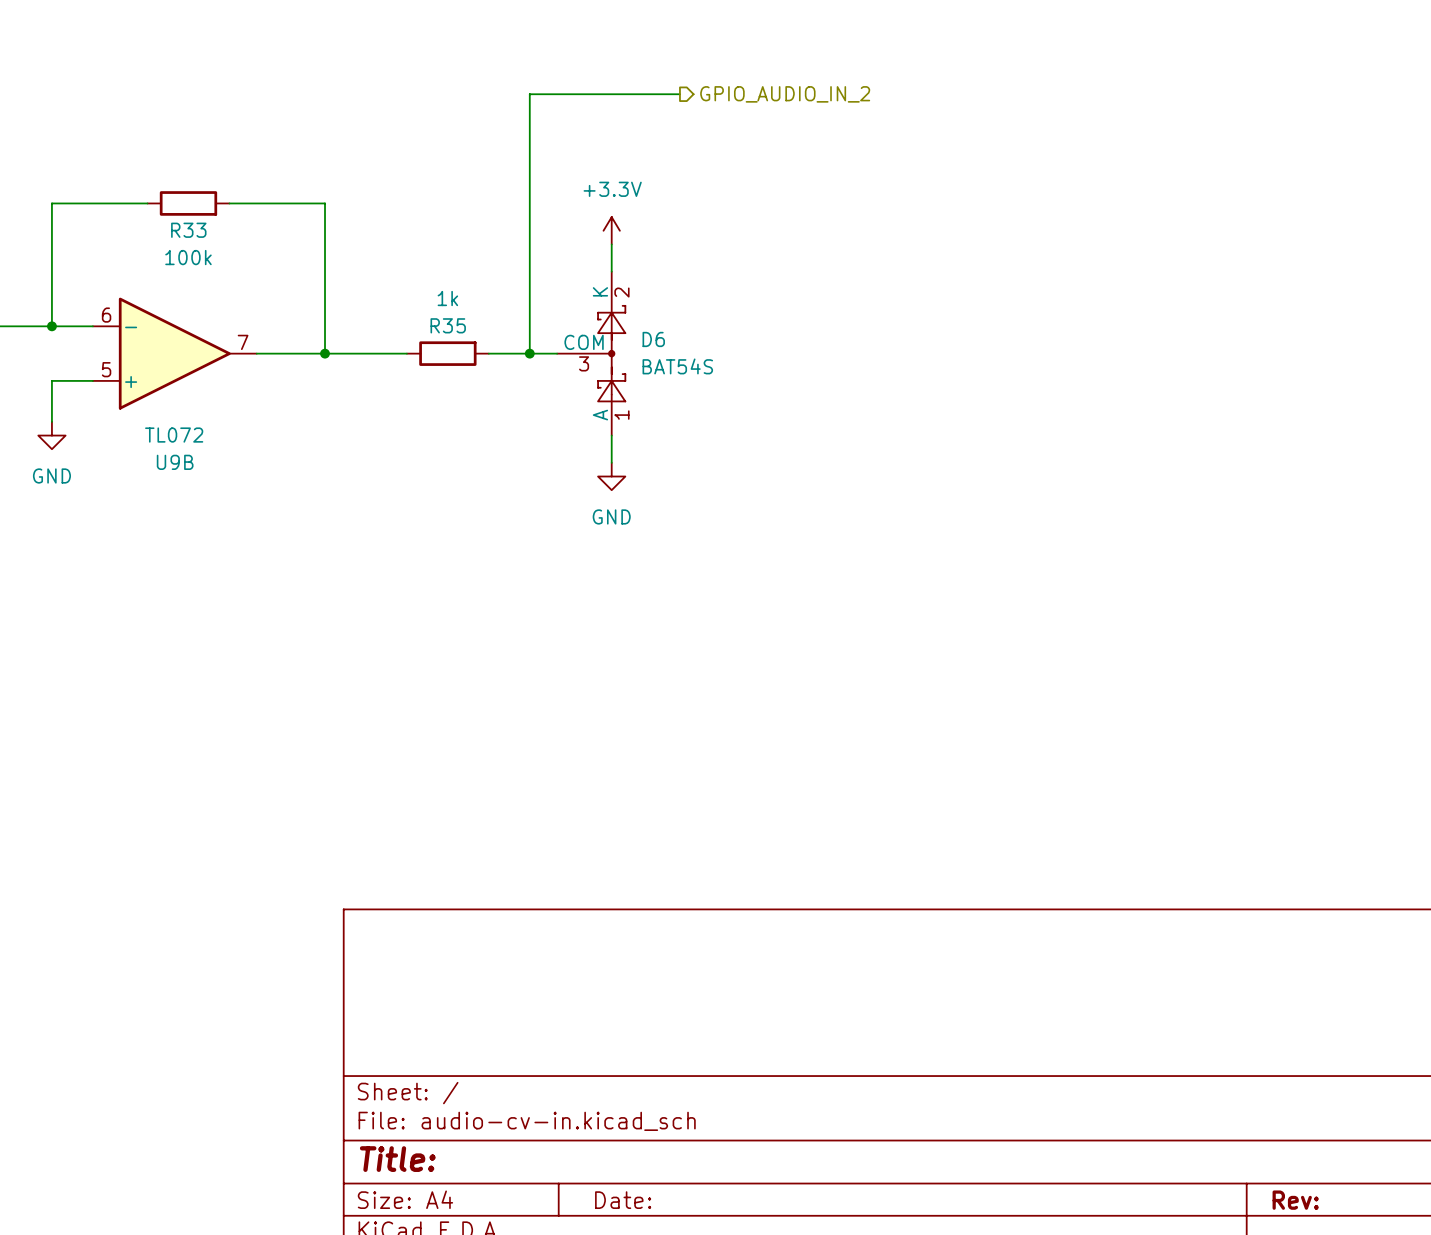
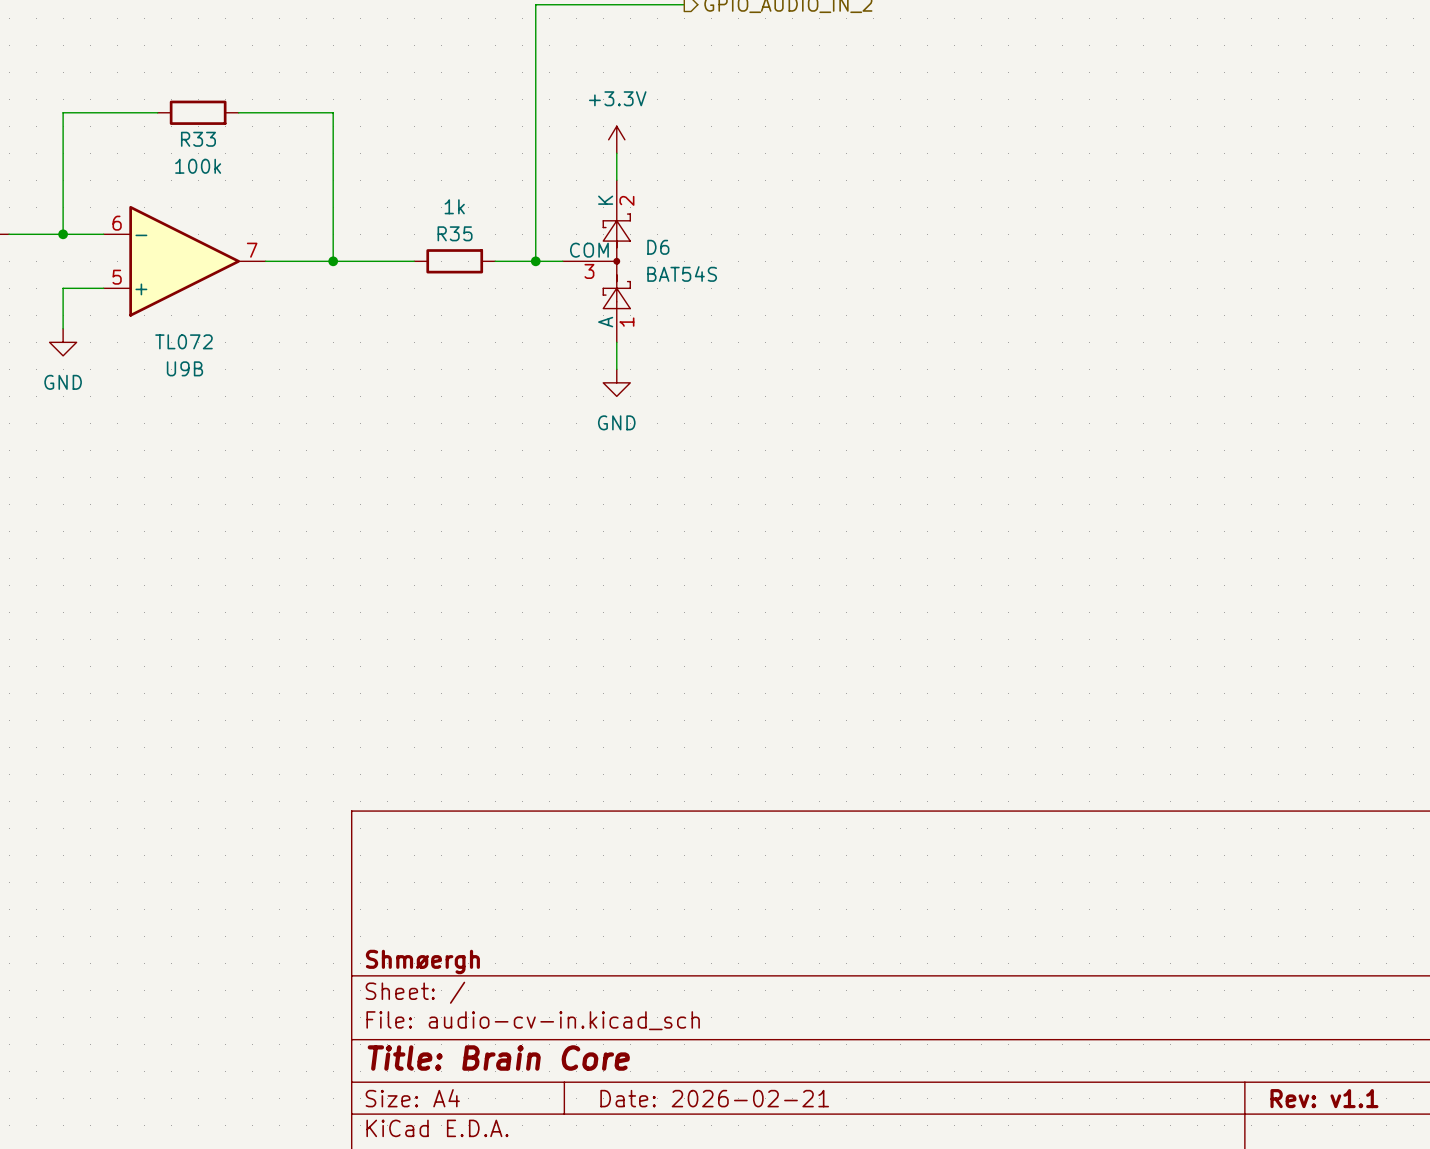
title block: none -> Shmøergh (422, 961)
title block: Title: (397, 1159) -> Title: Brain Core (498, 1058)
title block: Date: (623, 1200) -> Date: 2026-02-21 (714, 1098)
title block: Rev: (1295, 1200) -> Rev: v1.1 (1324, 1098)

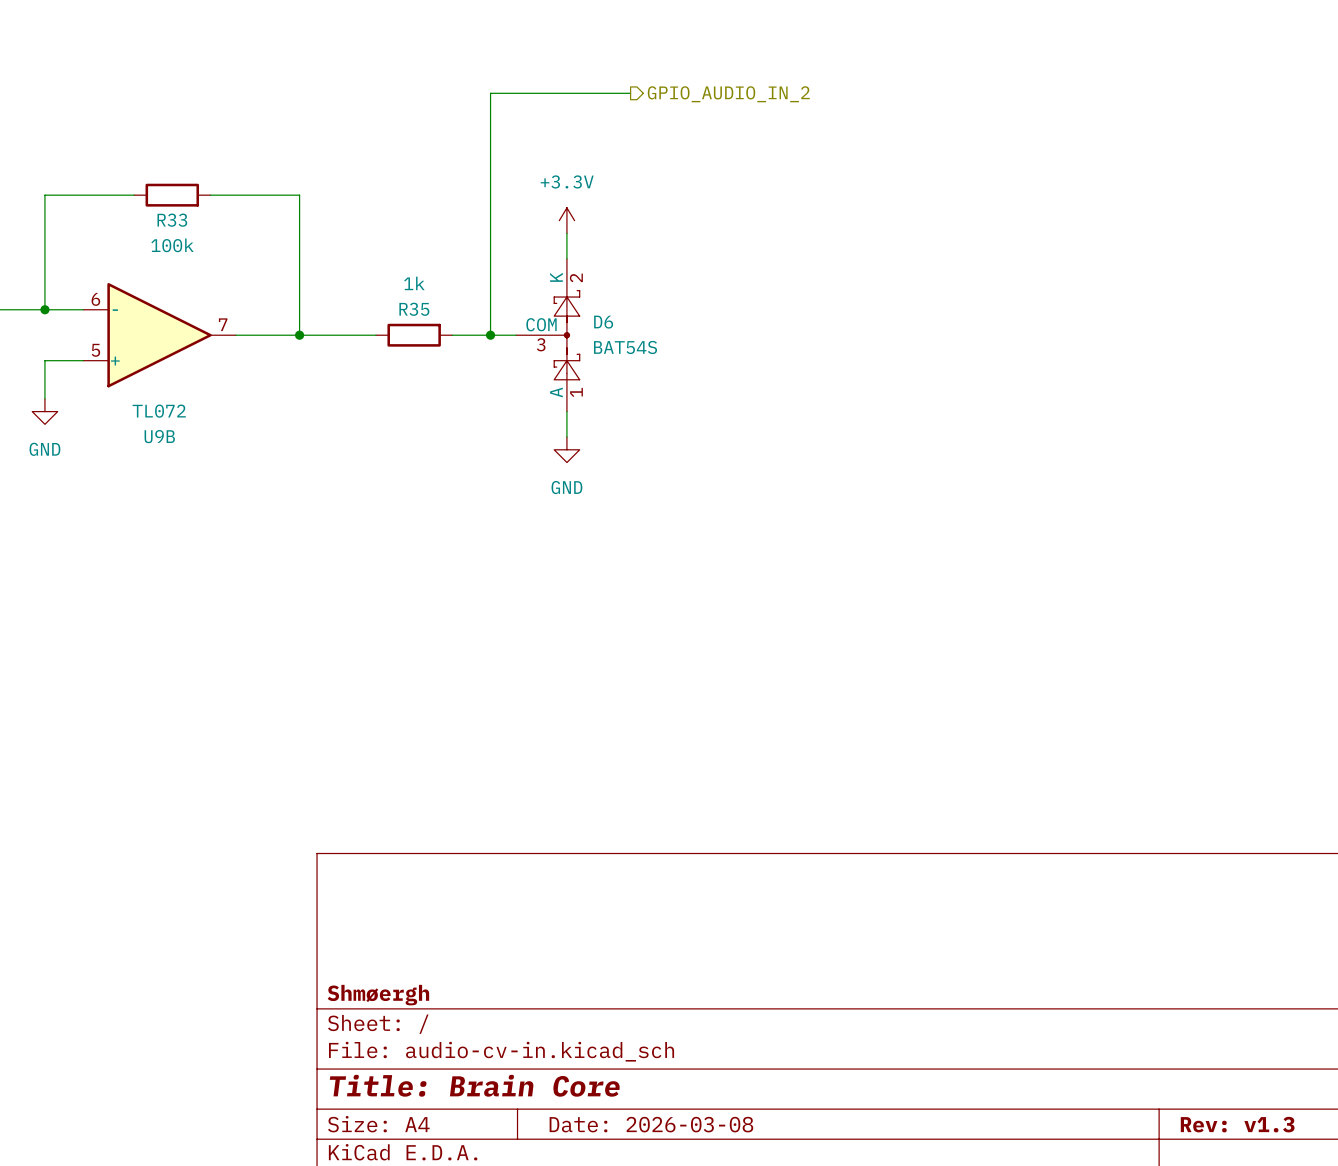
title block: Date: 2026-02-21 (714, 1098) -> Date: 2026-03-08 (651, 1124)
title block: Rev: v1.1 (1324, 1098) -> Rev: v1.3 (1237, 1124)

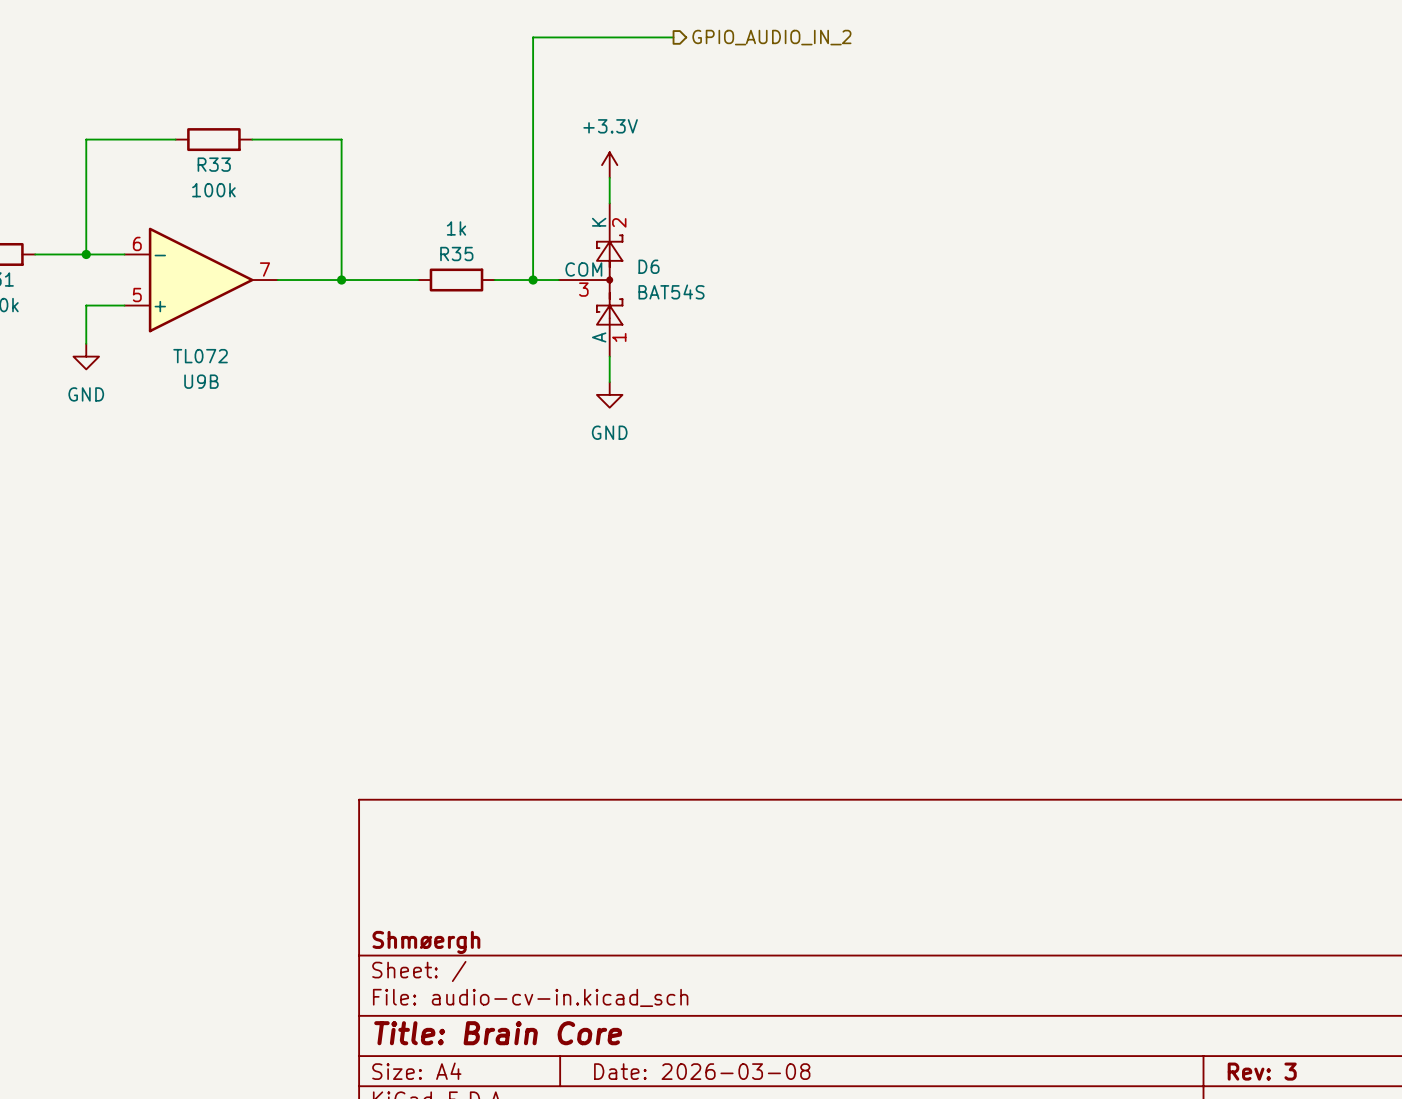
title block: Rev: v1.3 (1237, 1124) -> Rev: 3 (1262, 1071)

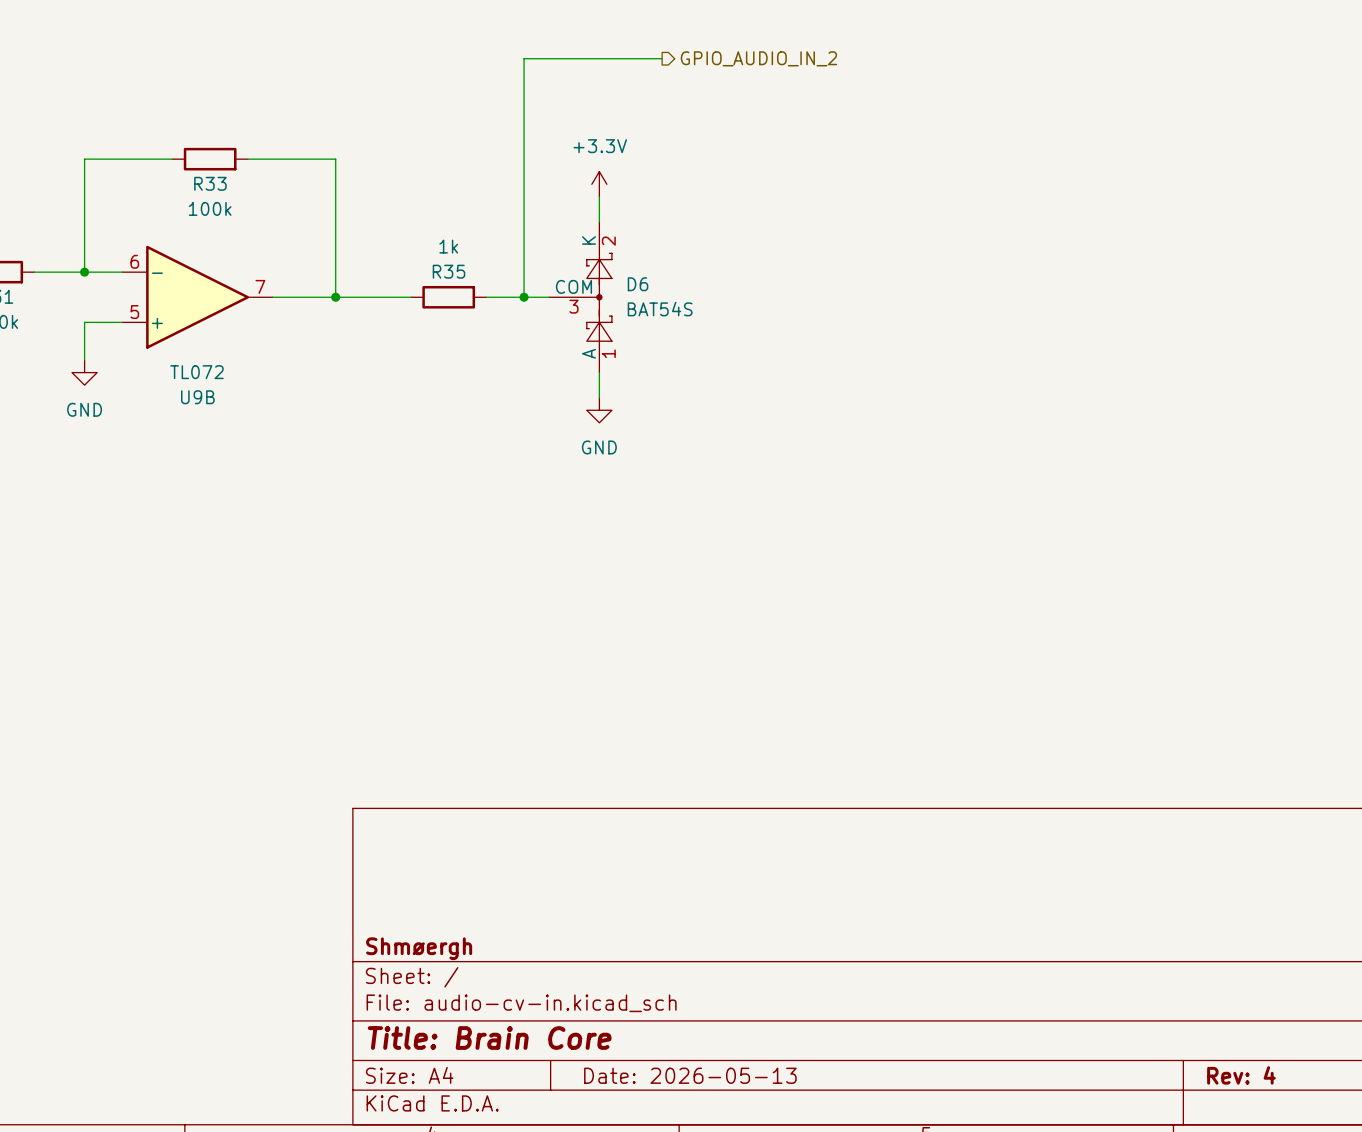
title block: Date: 2026-03-08 (702, 1071) -> Date: 2026-05-13 (690, 1075)
title block: Rev: 3 (1262, 1071) -> Rev: 4 (1241, 1075)

